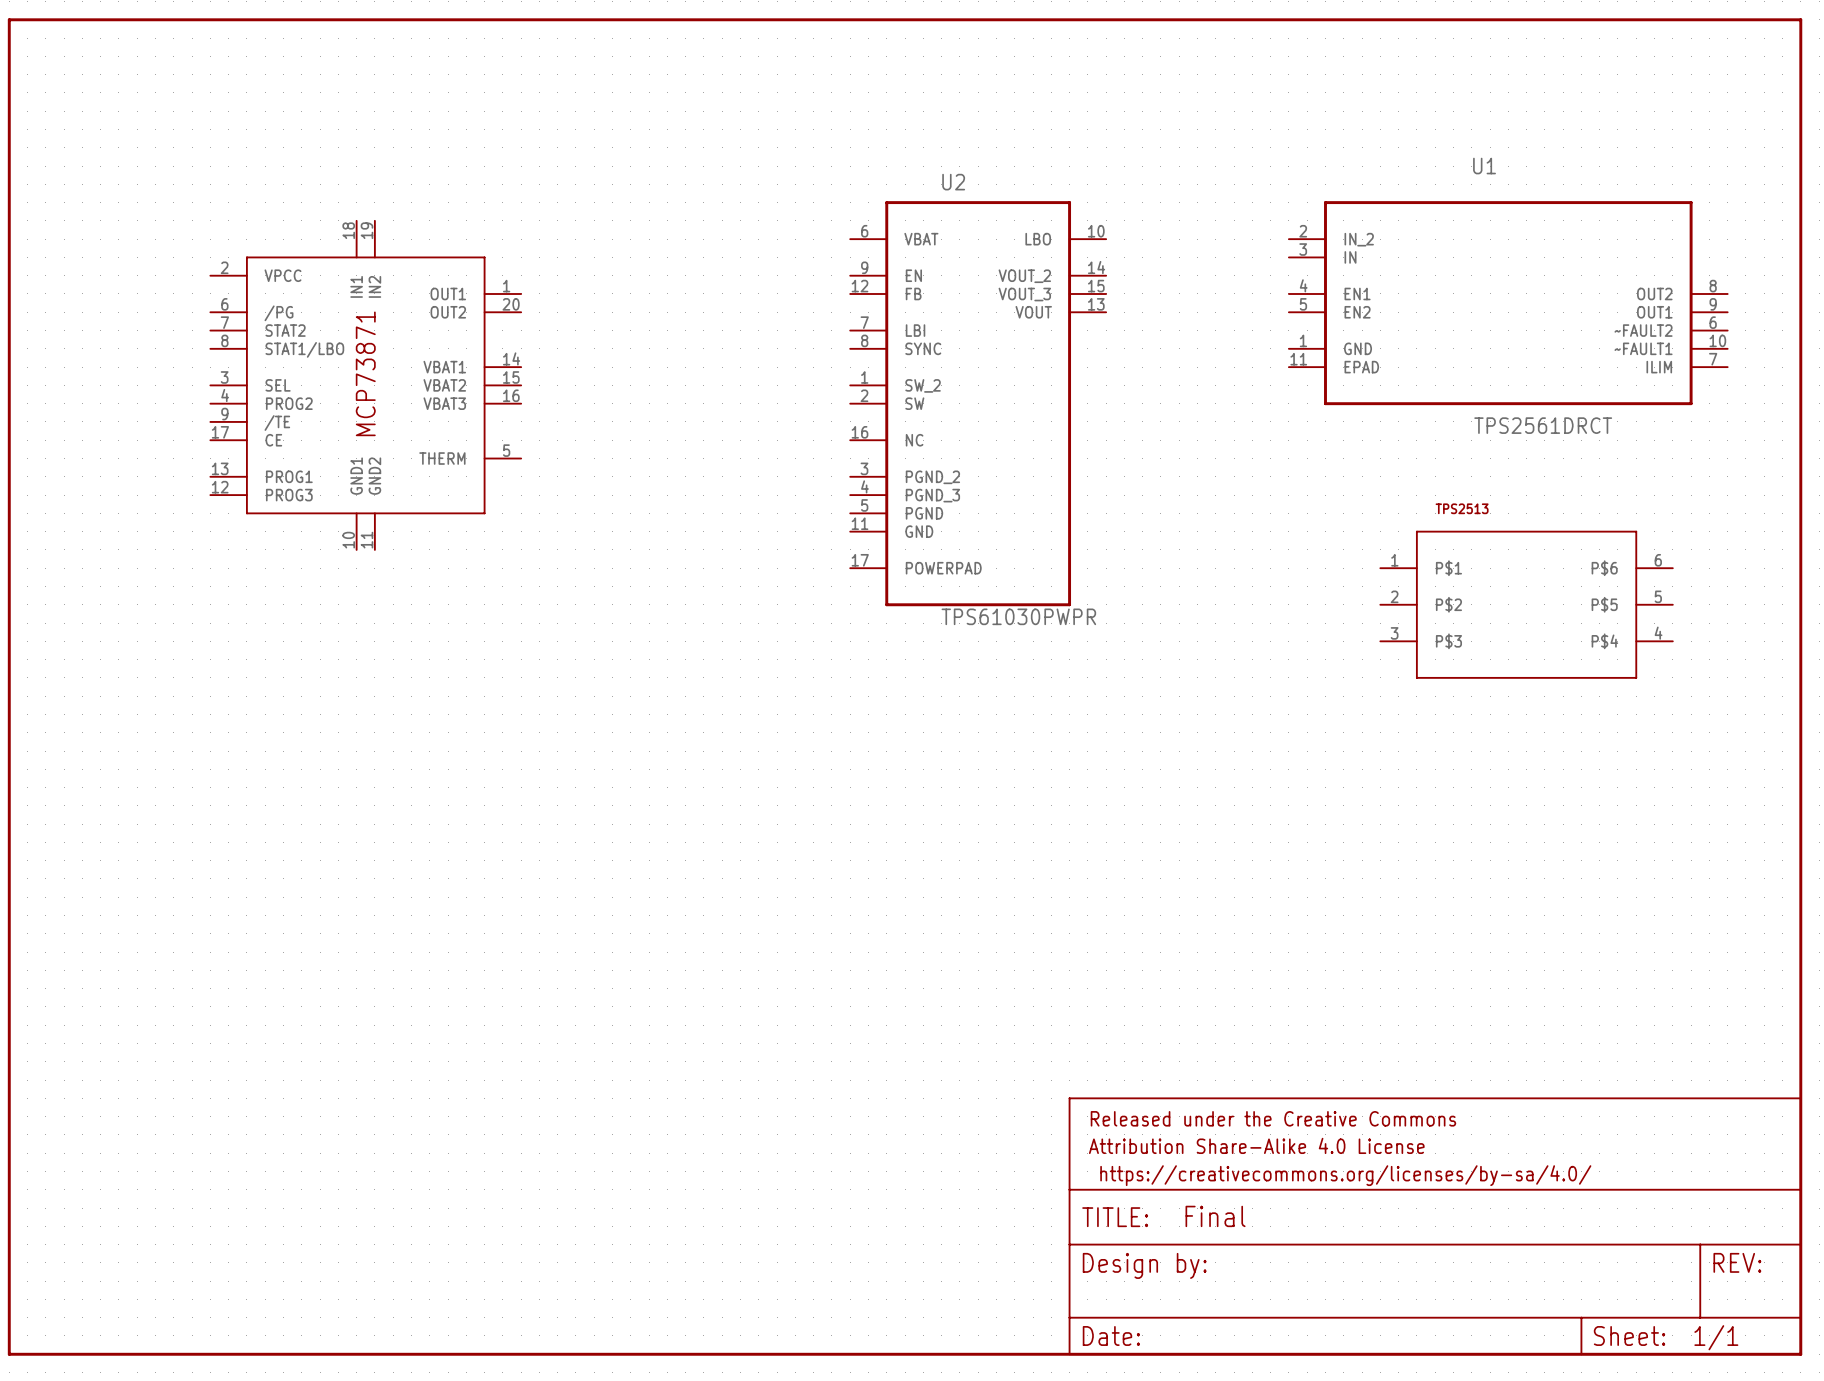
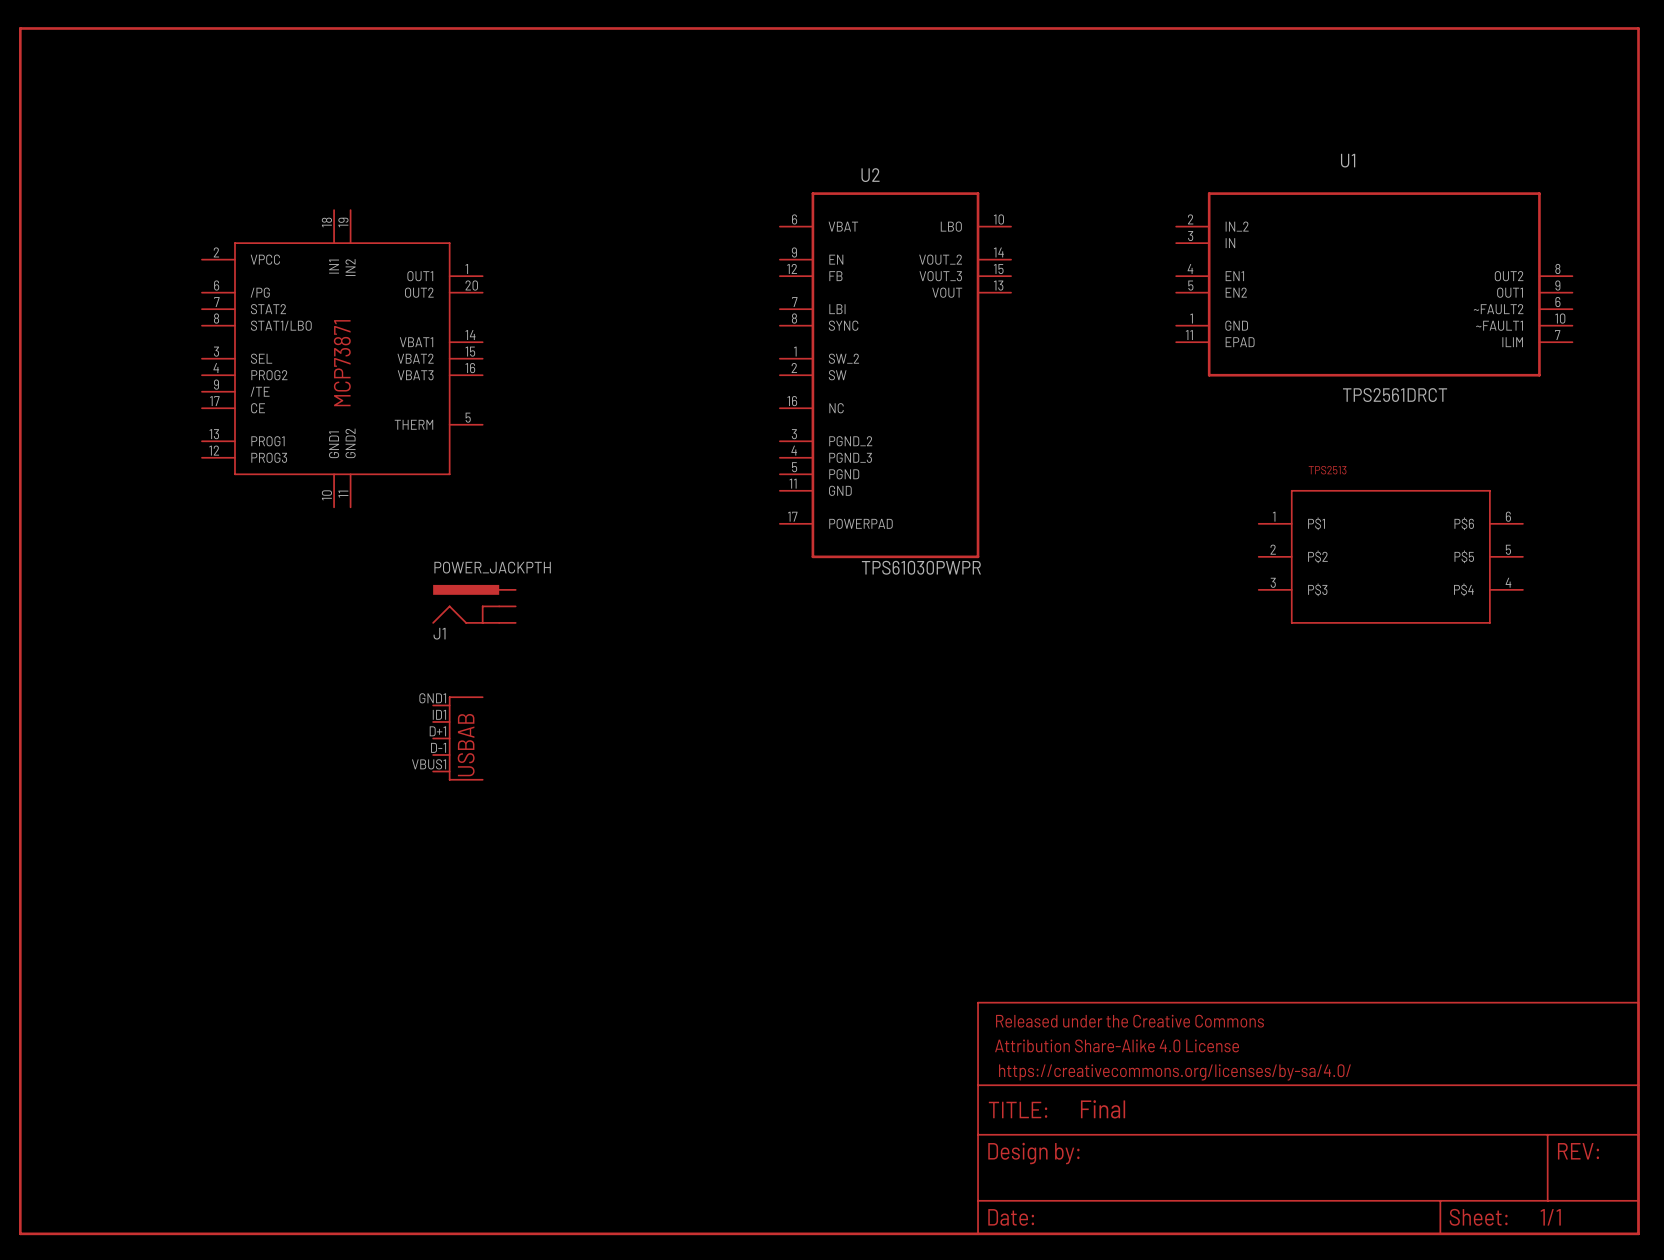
J1: none -> POWER_JACKPTH (474, 604)
part: none -> (458, 738)

